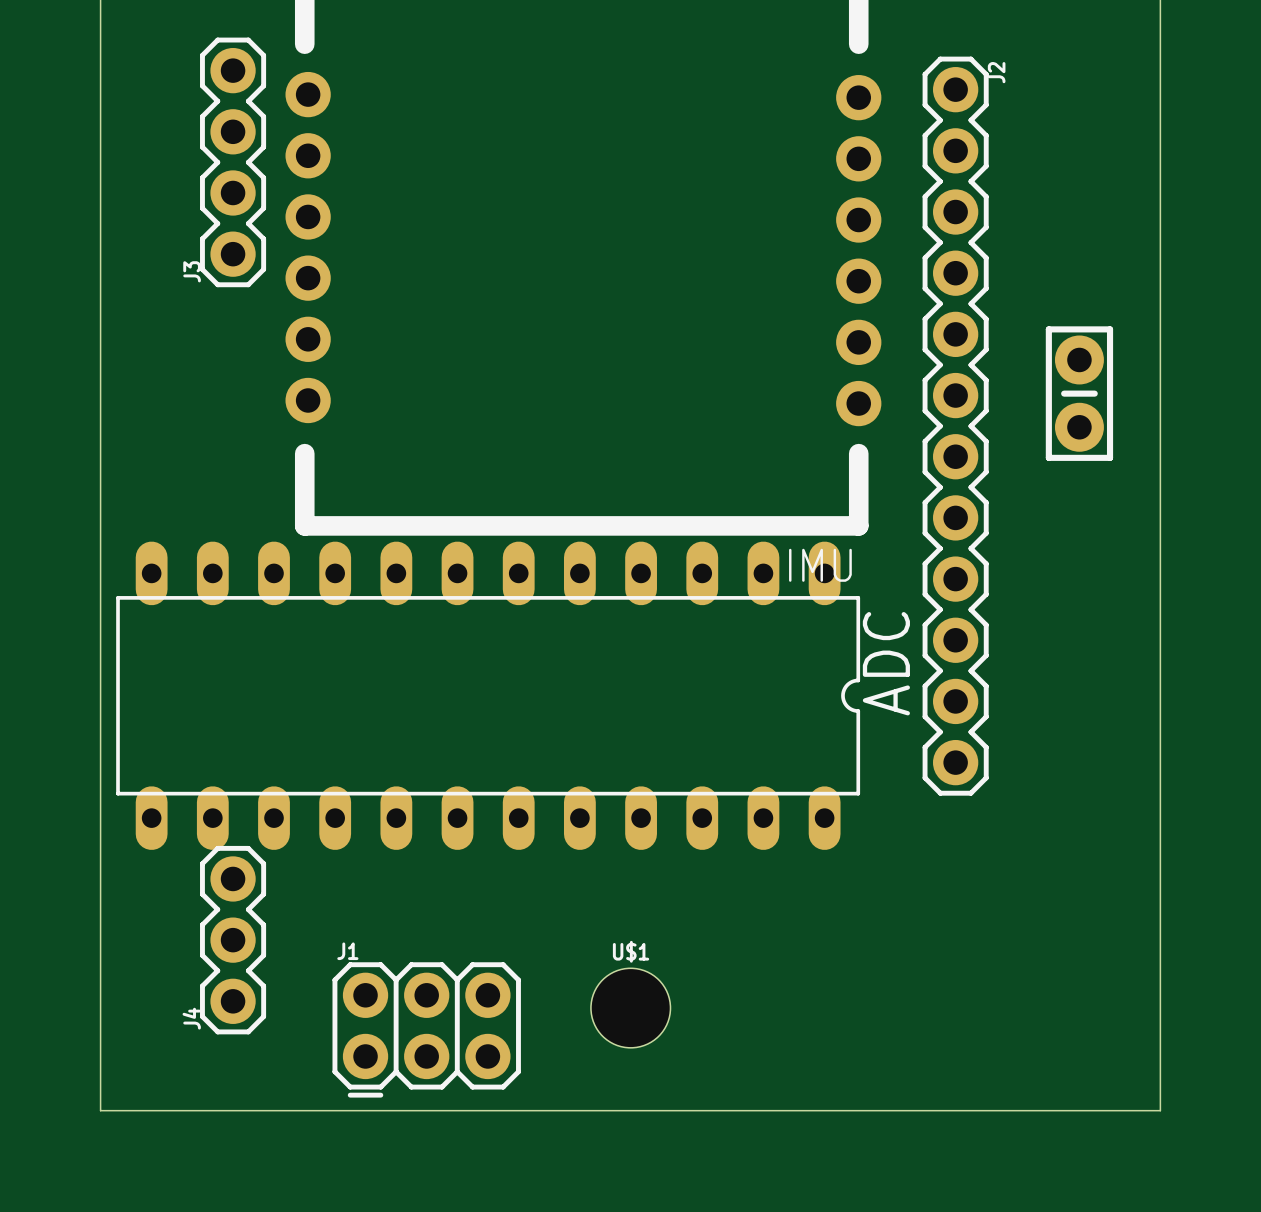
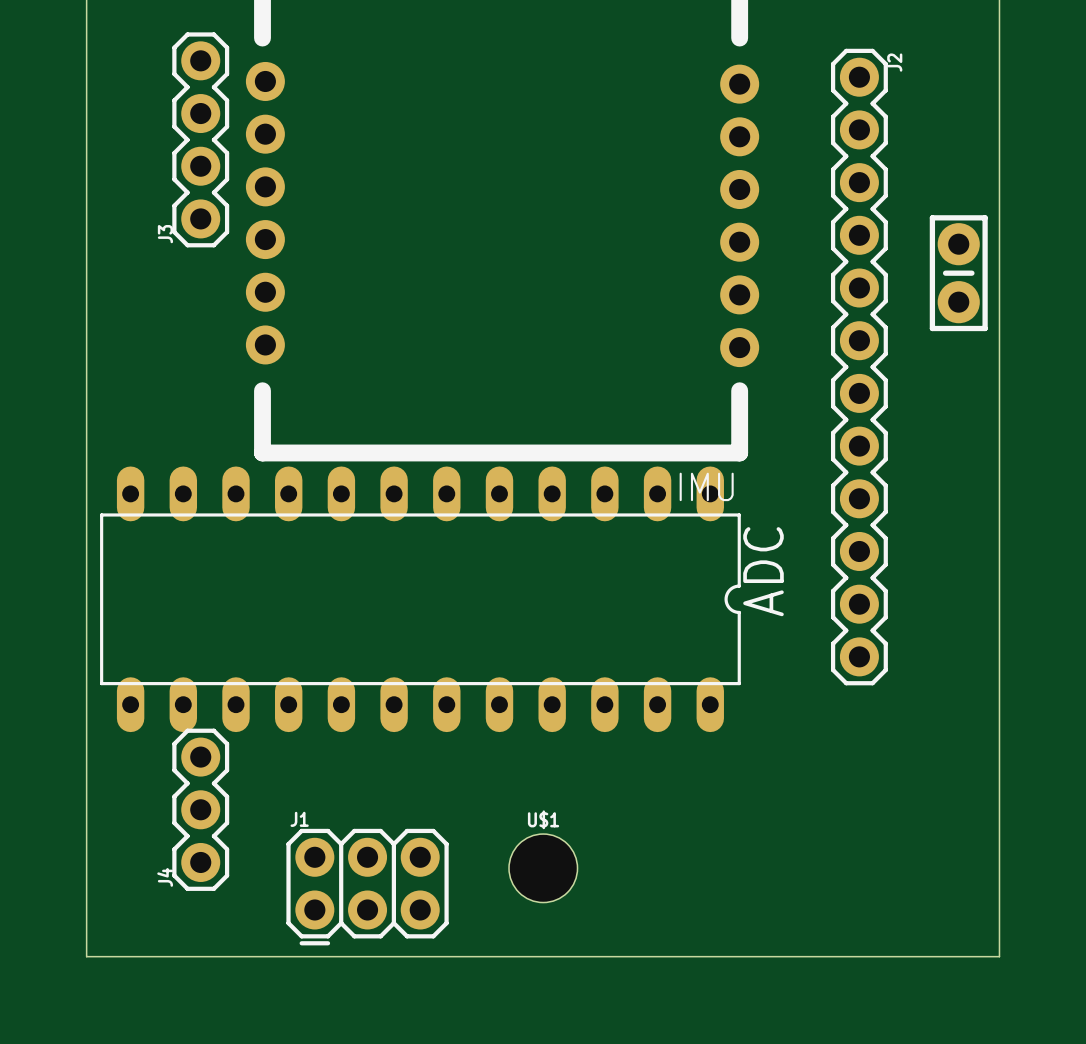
part position: (1079, 393) -> (958, 273)
J2 position: (955, 426) -> (859, 367)

